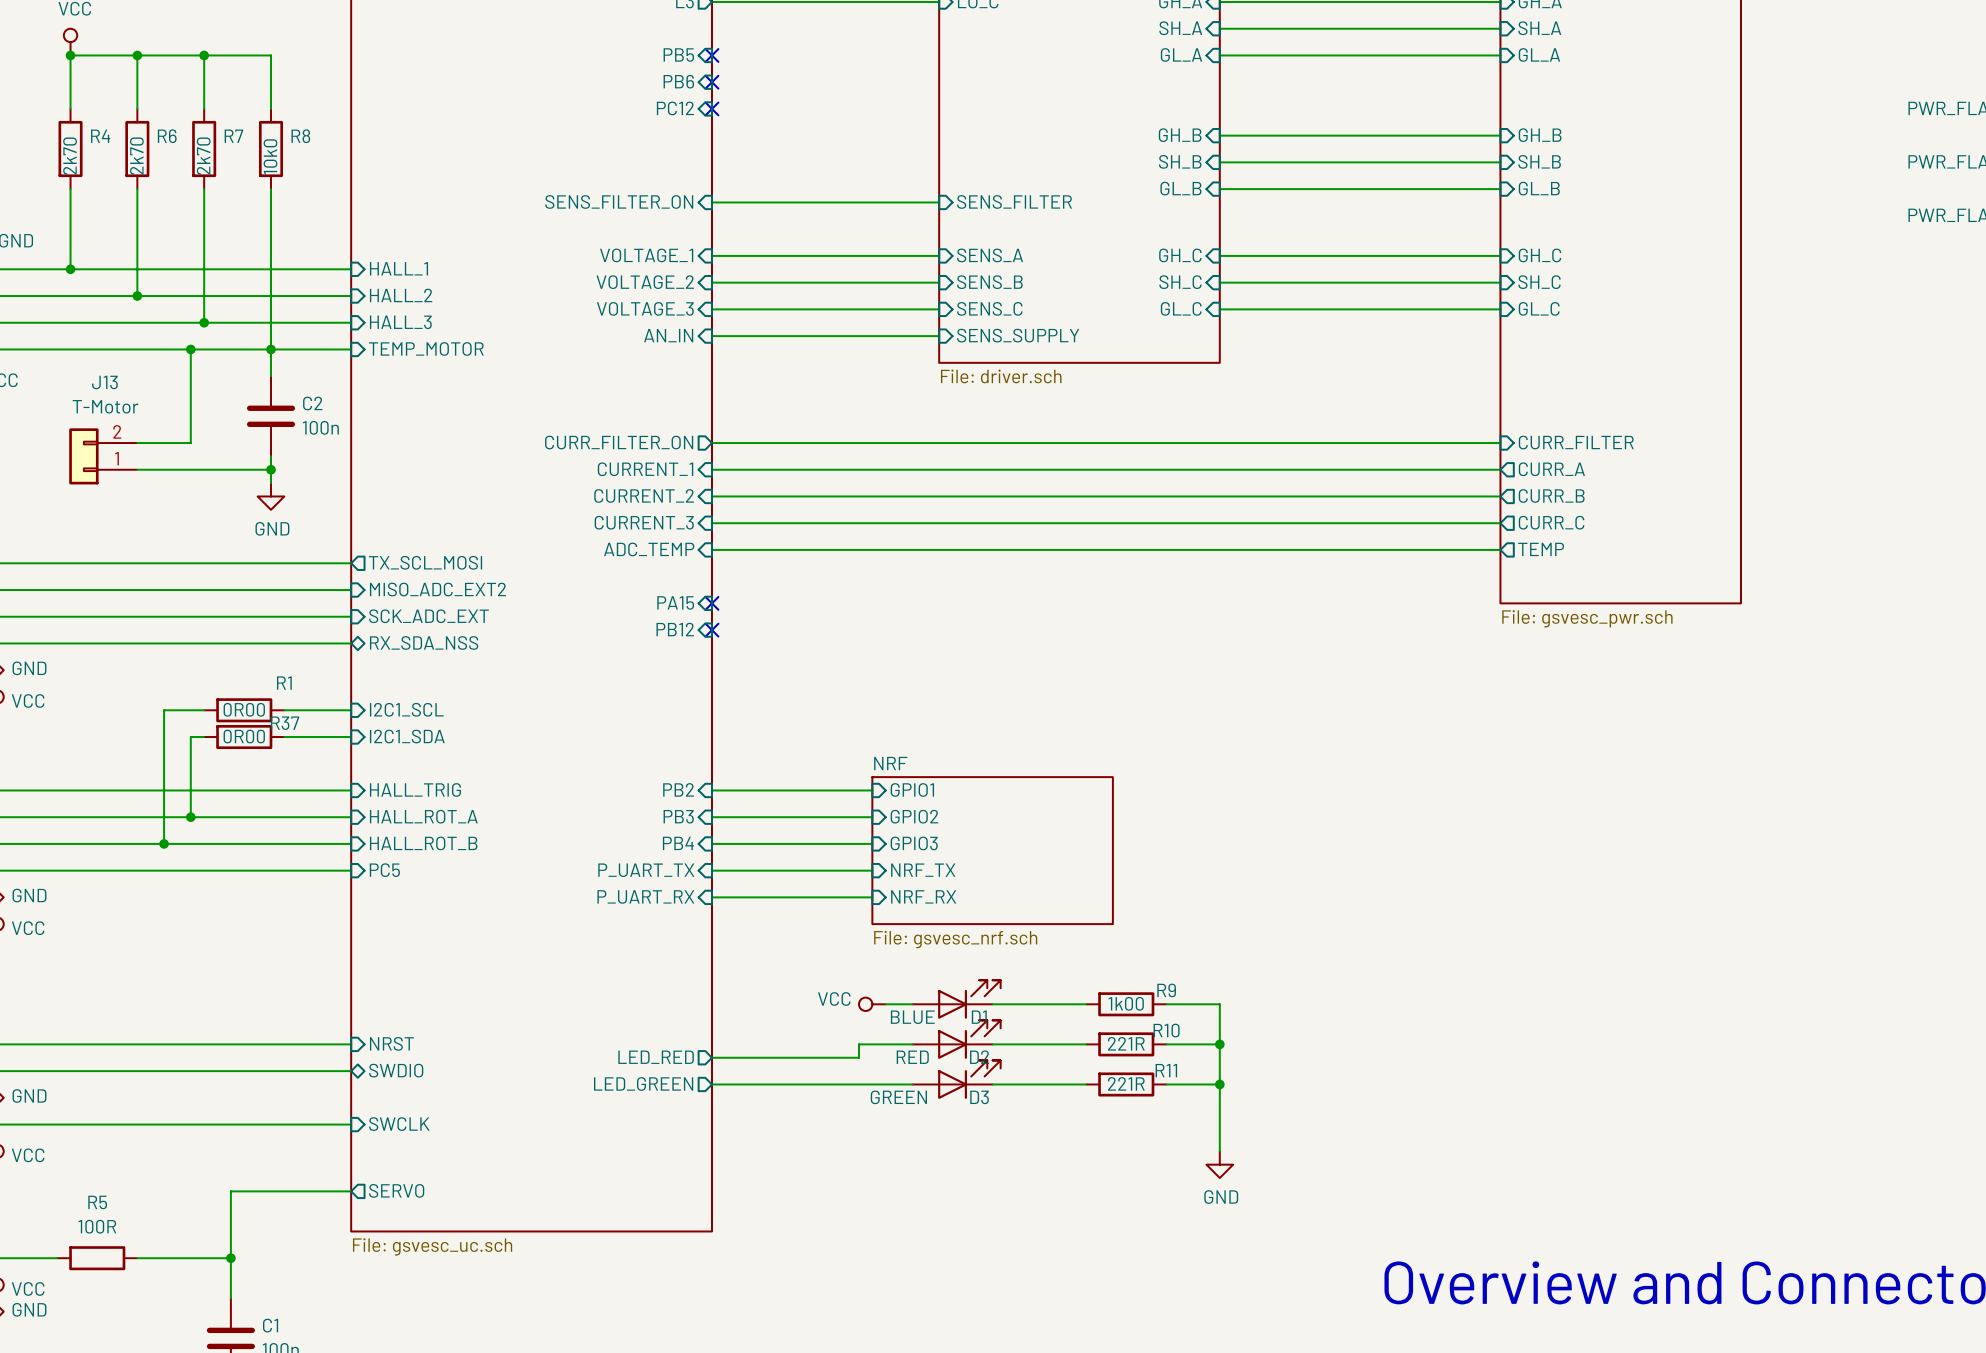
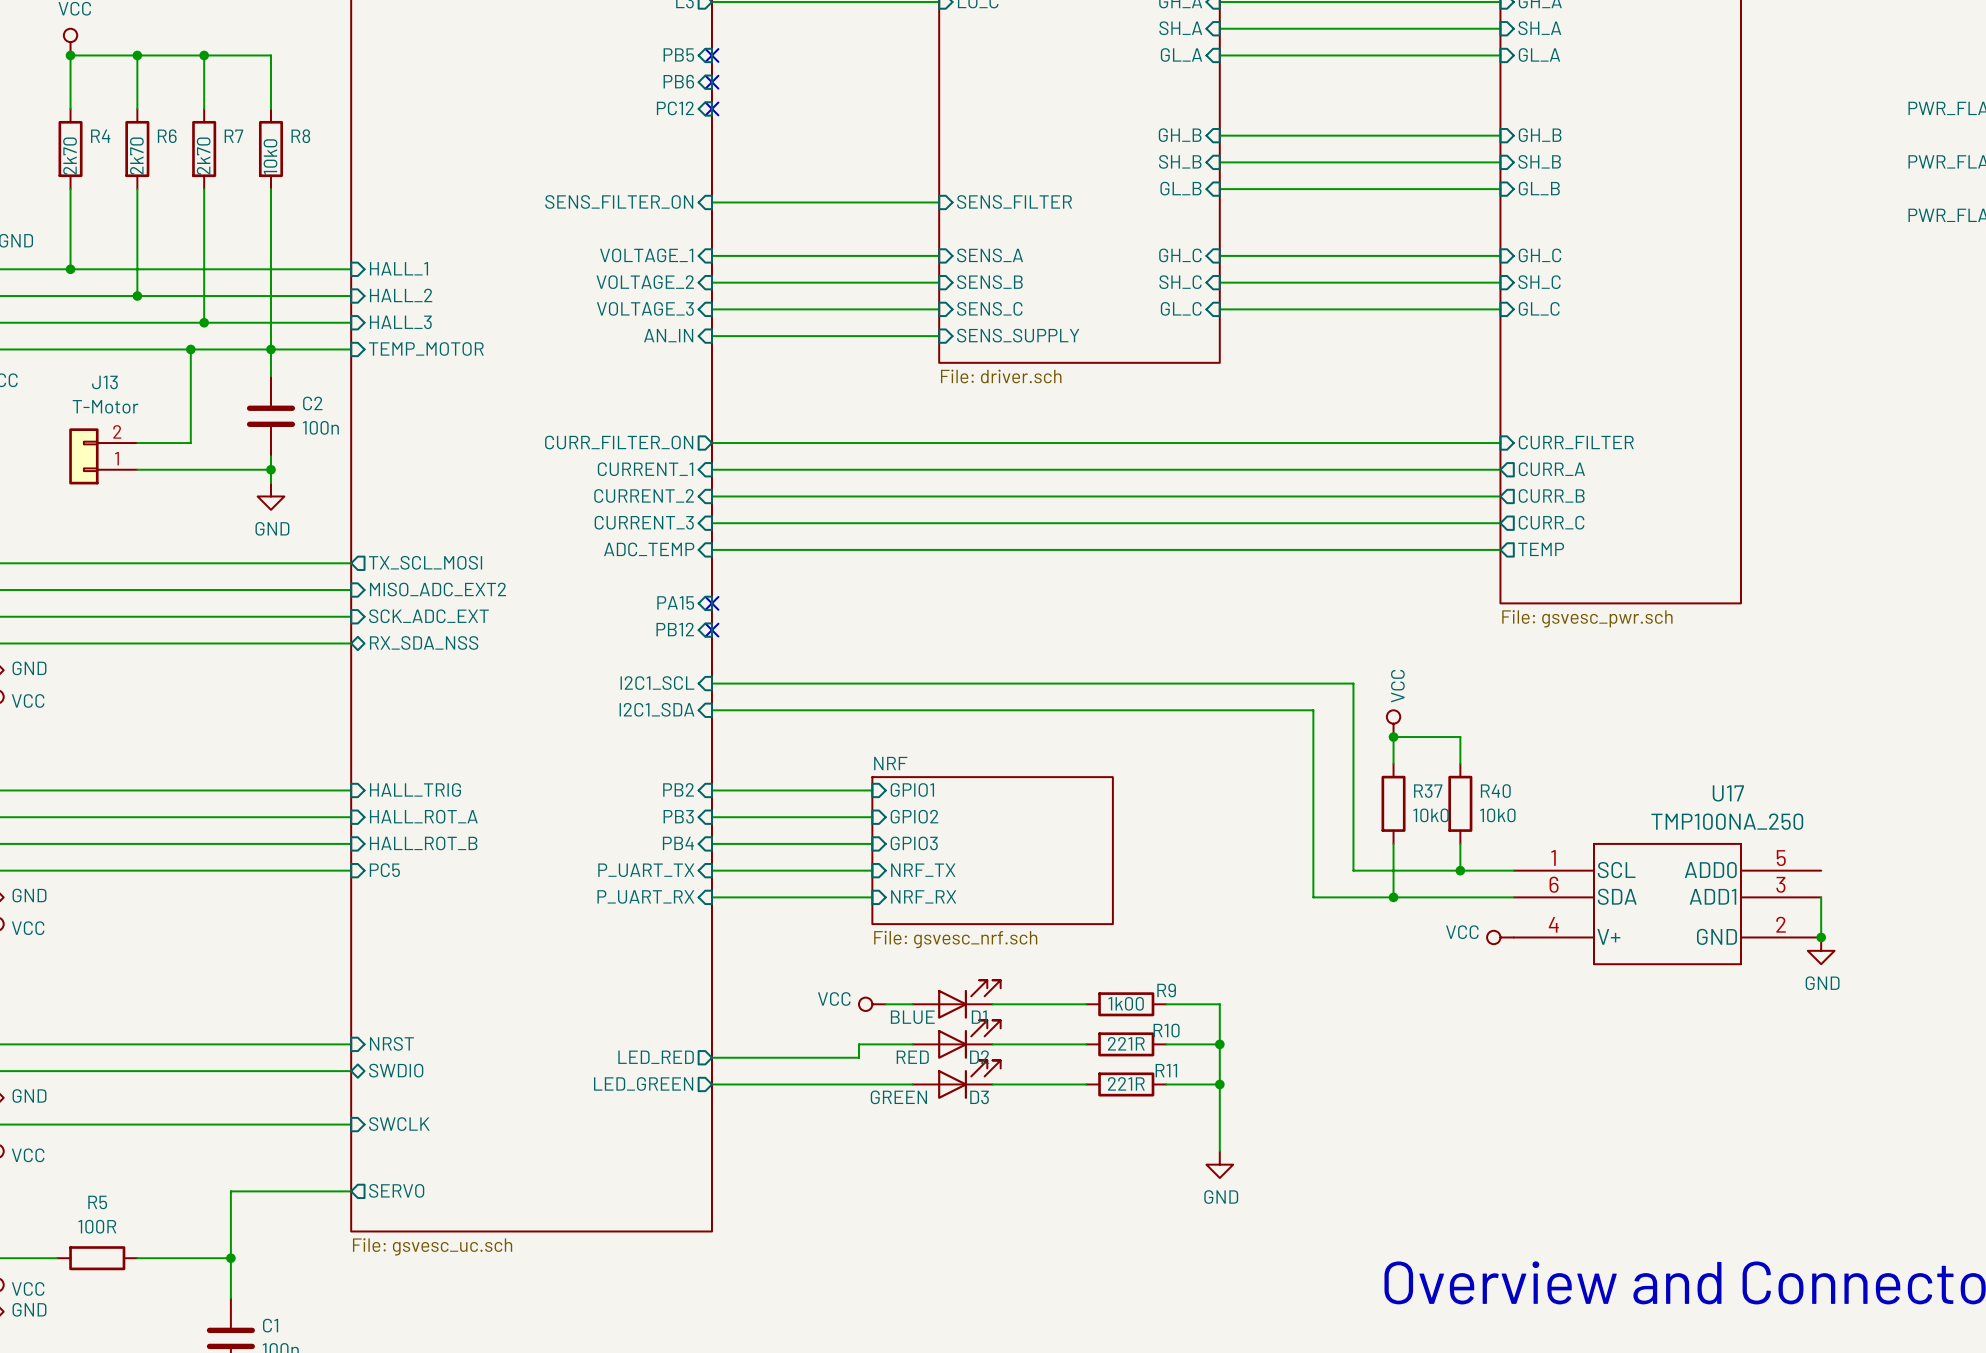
sheet pin: none -> I2C1_SCL (657, 683)
wire: none -> (711, 683) (1353, 683) (1353, 870) (1513, 870)
sheet pin: I2C1_SCL (406, 709) -> none
sheet pin: none -> I2C1_SDA (656, 709)
wire: (204, 710) (164, 710) (164, 843) -> none
R1: 0R00 (244, 710) -> none
wire: (284, 710) (351, 710) -> none
wire: none -> (711, 710) (1313, 710) (1313, 897) (1513, 897)
power symbol: none -> VCC (1393, 723)
R37 value: 0R00 (244, 736) -> 10k0 (1431, 815)
sheet pin: I2C1_SDA (407, 736) -> none
wire: (204, 737) (190, 737) (190, 817) -> none
R37 rotation: 0° (244, 737) -> 90° clockwise (1393, 803)
R37 position: (244, 737) -> (1393, 803)
wire: (284, 737) (351, 737) -> none
junction: none -> (1393, 737)
wire: none -> (1393, 763) (1393, 737) (1460, 737) (1460, 763)
R40: none -> 10k0 (1460, 803)
junction: (190, 817) -> none
junction: (164, 843) -> none
wire: none -> (1393, 843) (1393, 897)
wire: none -> (1460, 843) (1460, 870)
junction: none -> (1460, 870)
junction: none -> (1393, 897)
wire: none -> (1821, 897) (1821, 937)
U17: none -> TMP100NA_250 (1667, 904)
power symbol: none -> VCC (1500, 937)
junction: none -> (1821, 937)
power symbol: none -> GND (1821, 950)

